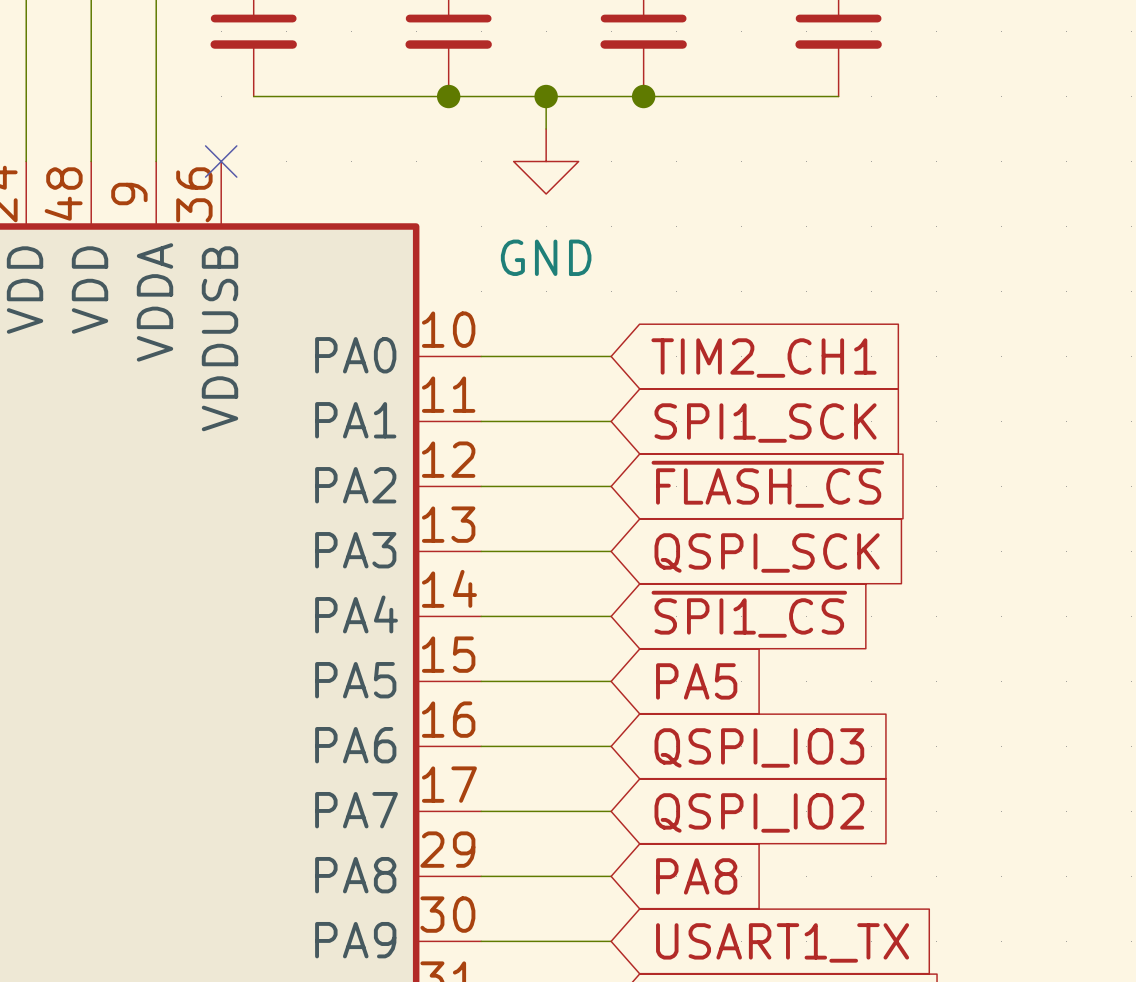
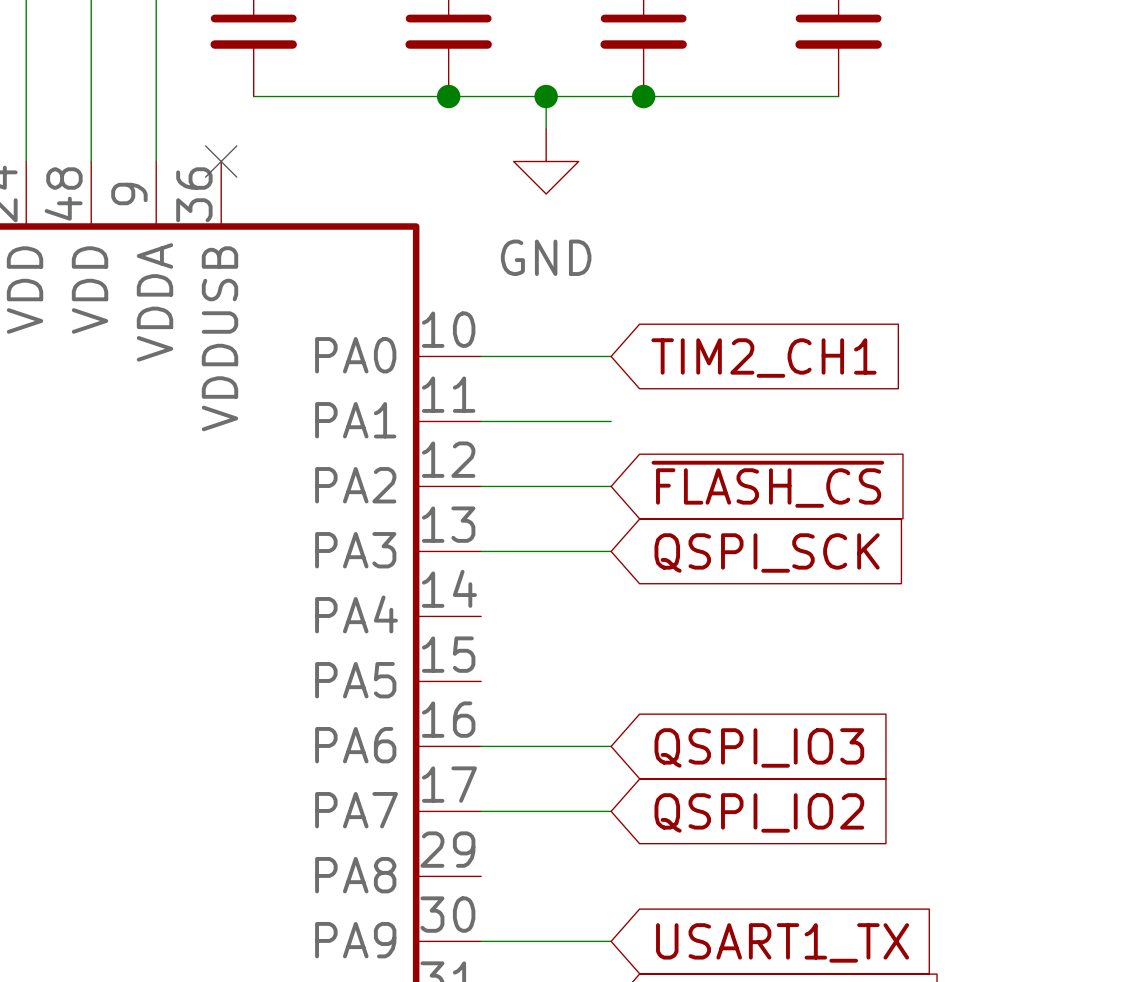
global label: SPI1_SCK (765, 423) -> none
global label: ~{SPI1_CS} (749, 614) -> none
wire: (481, 616) (611, 616) -> none
wire: (481, 681) (611, 681) -> none
global label: PA5 (696, 681) -> none
wire: (481, 876) (611, 876) -> none
global label: PA8 (696, 876) -> none

